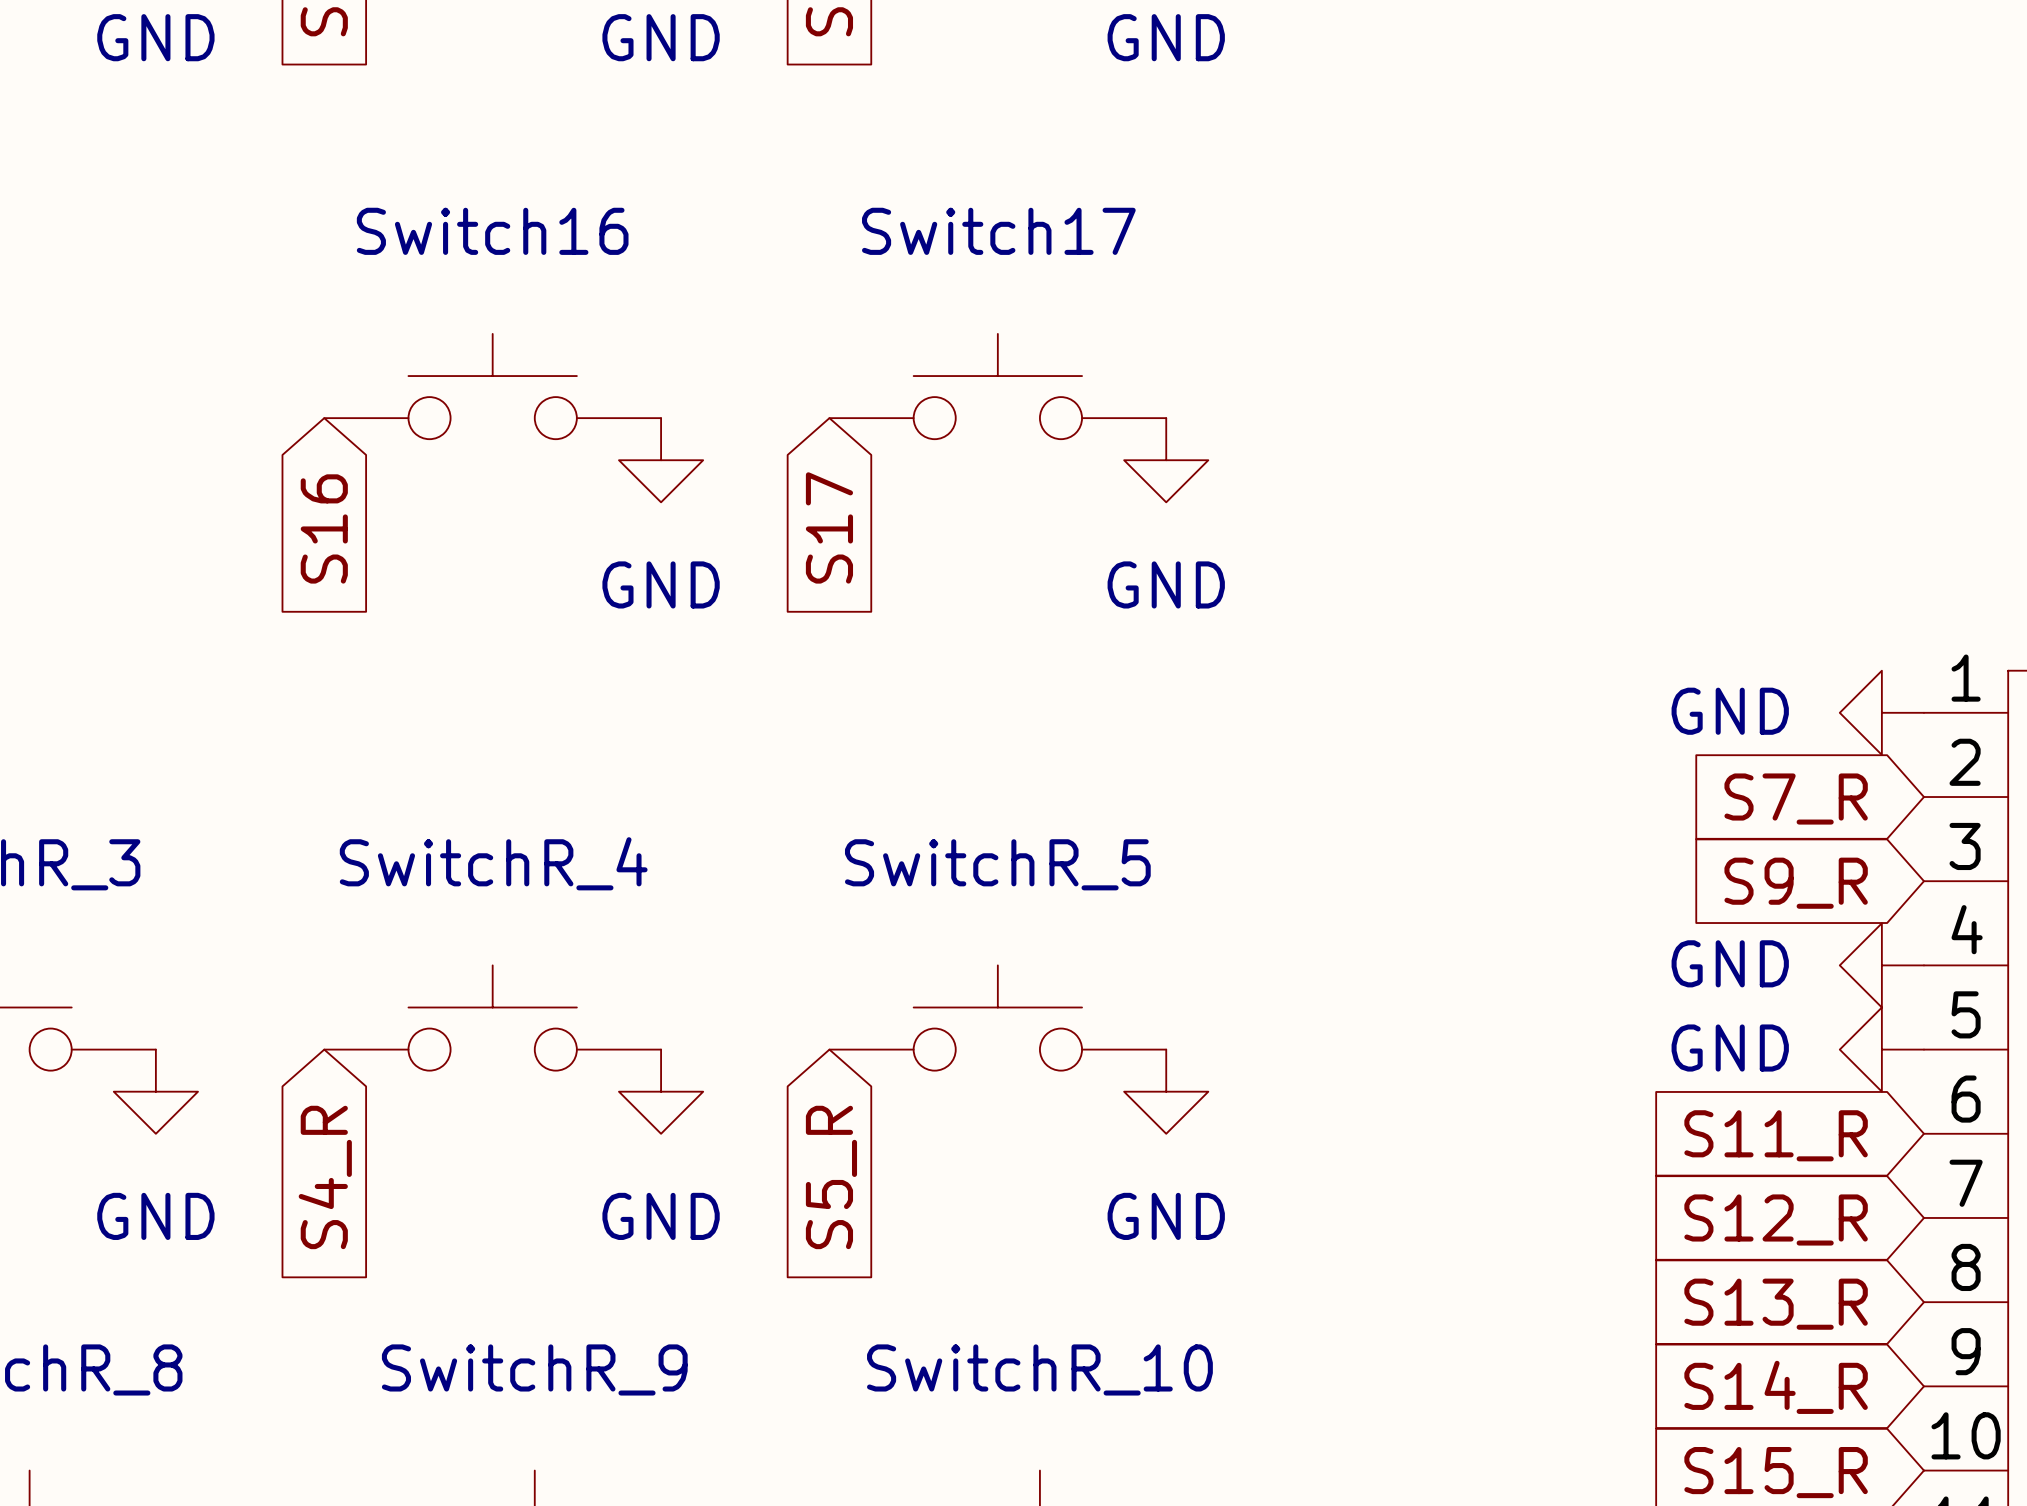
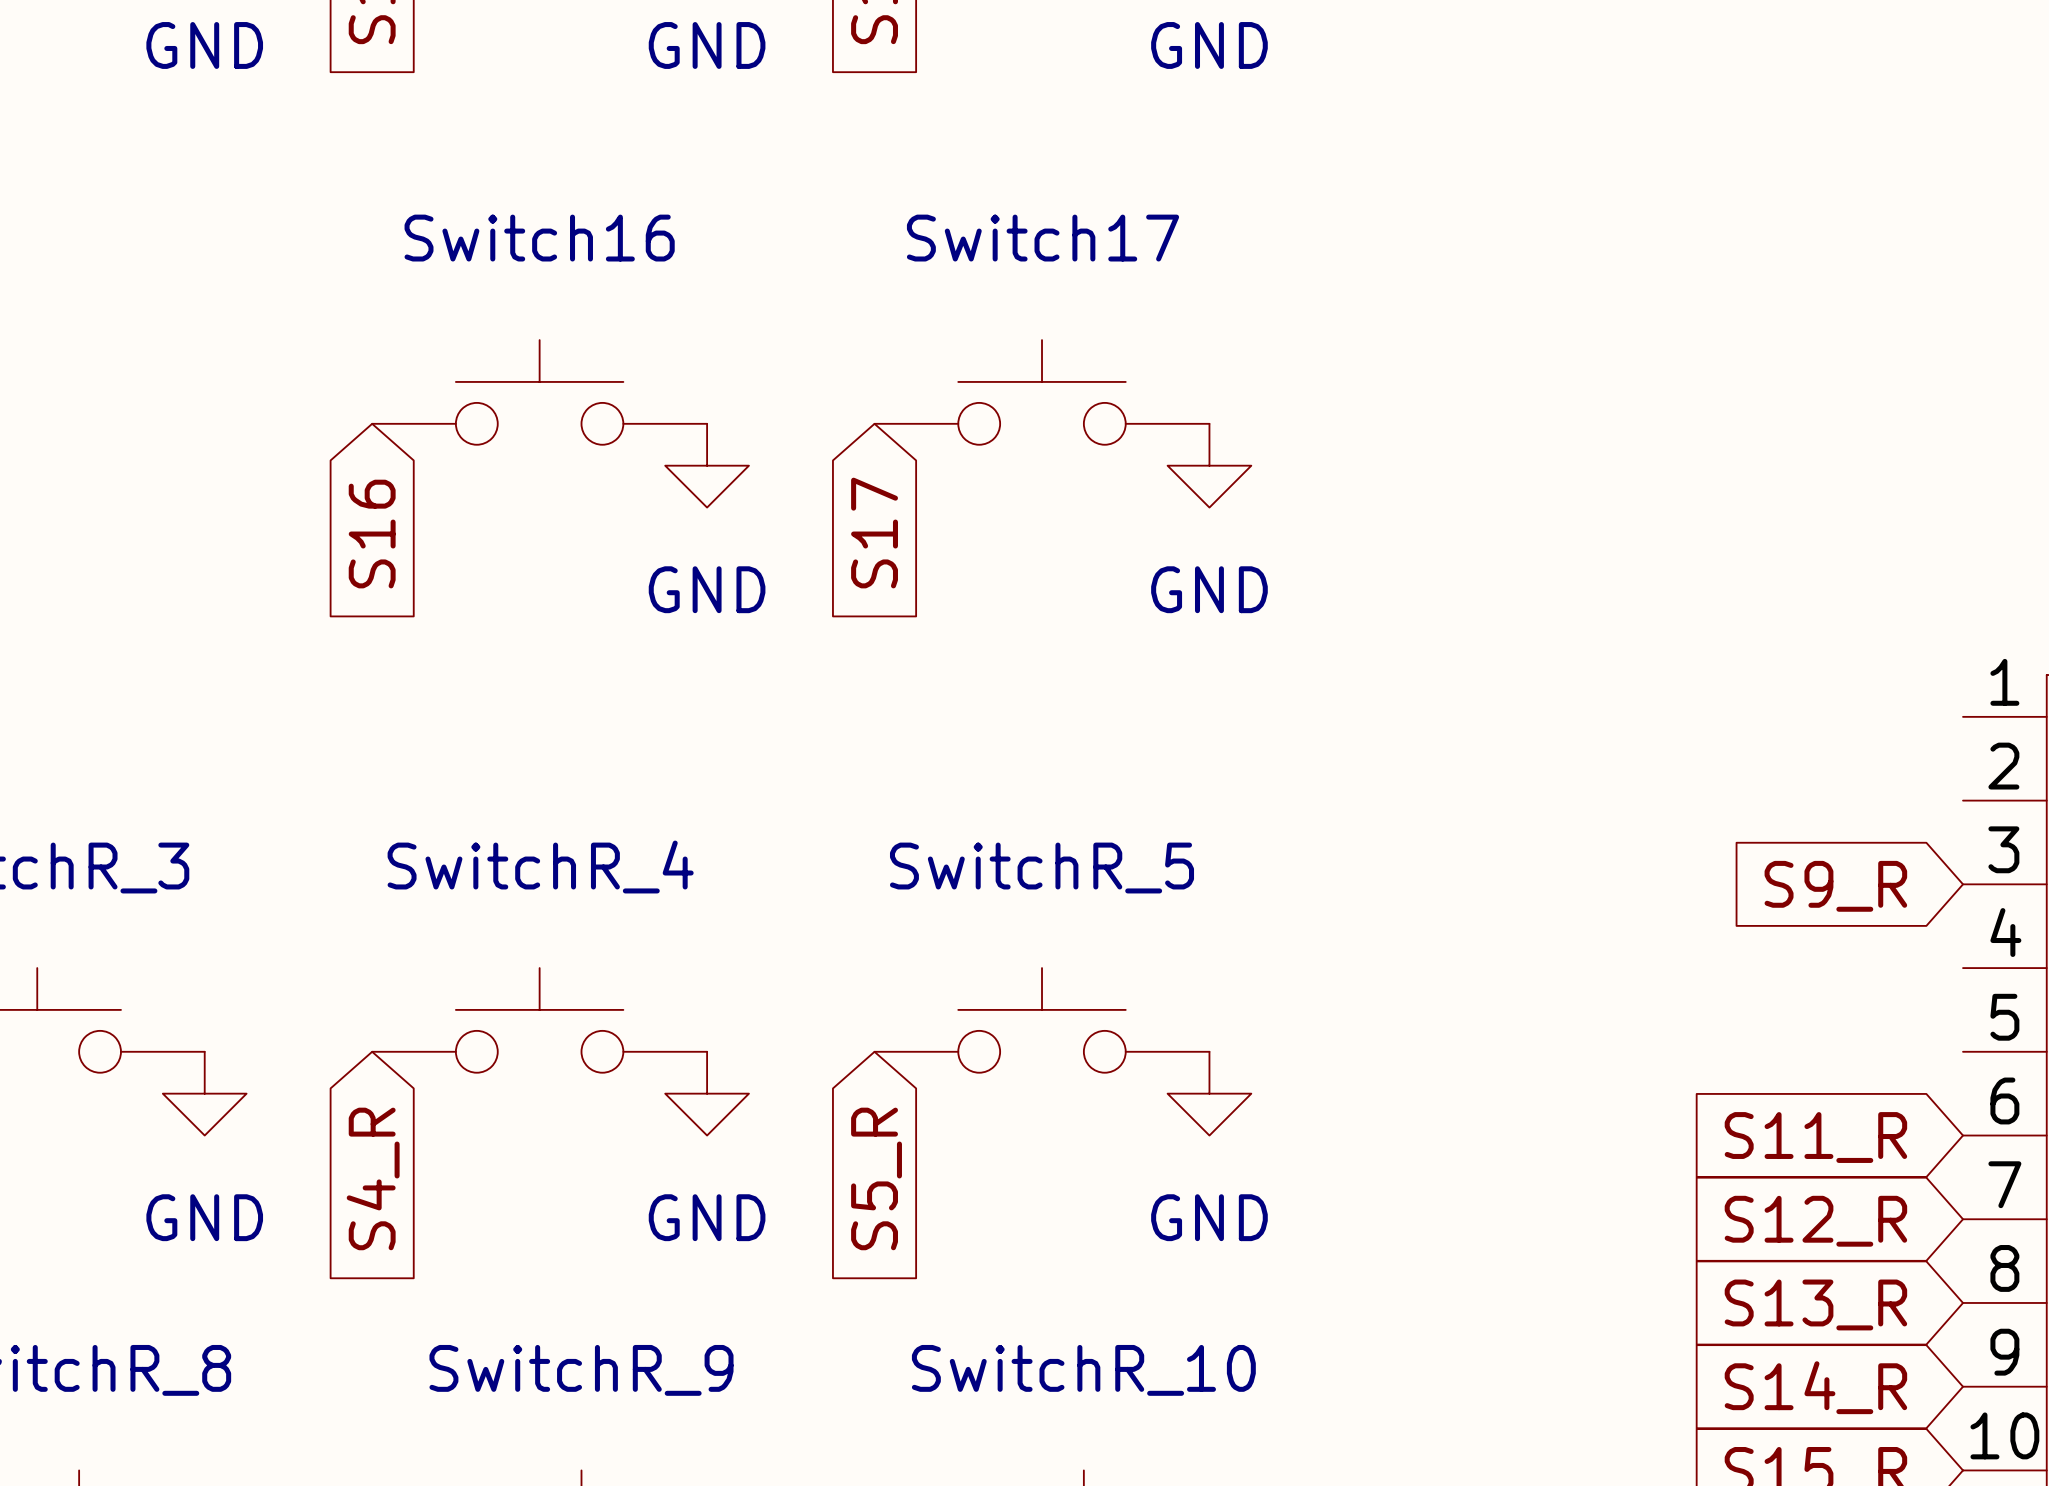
power symbol: GND (1881, 712) -> none
global label: S7_R (1796, 799) -> none
power symbol: GND (1881, 965) -> none
power symbol: GND (1881, 1049) -> none

